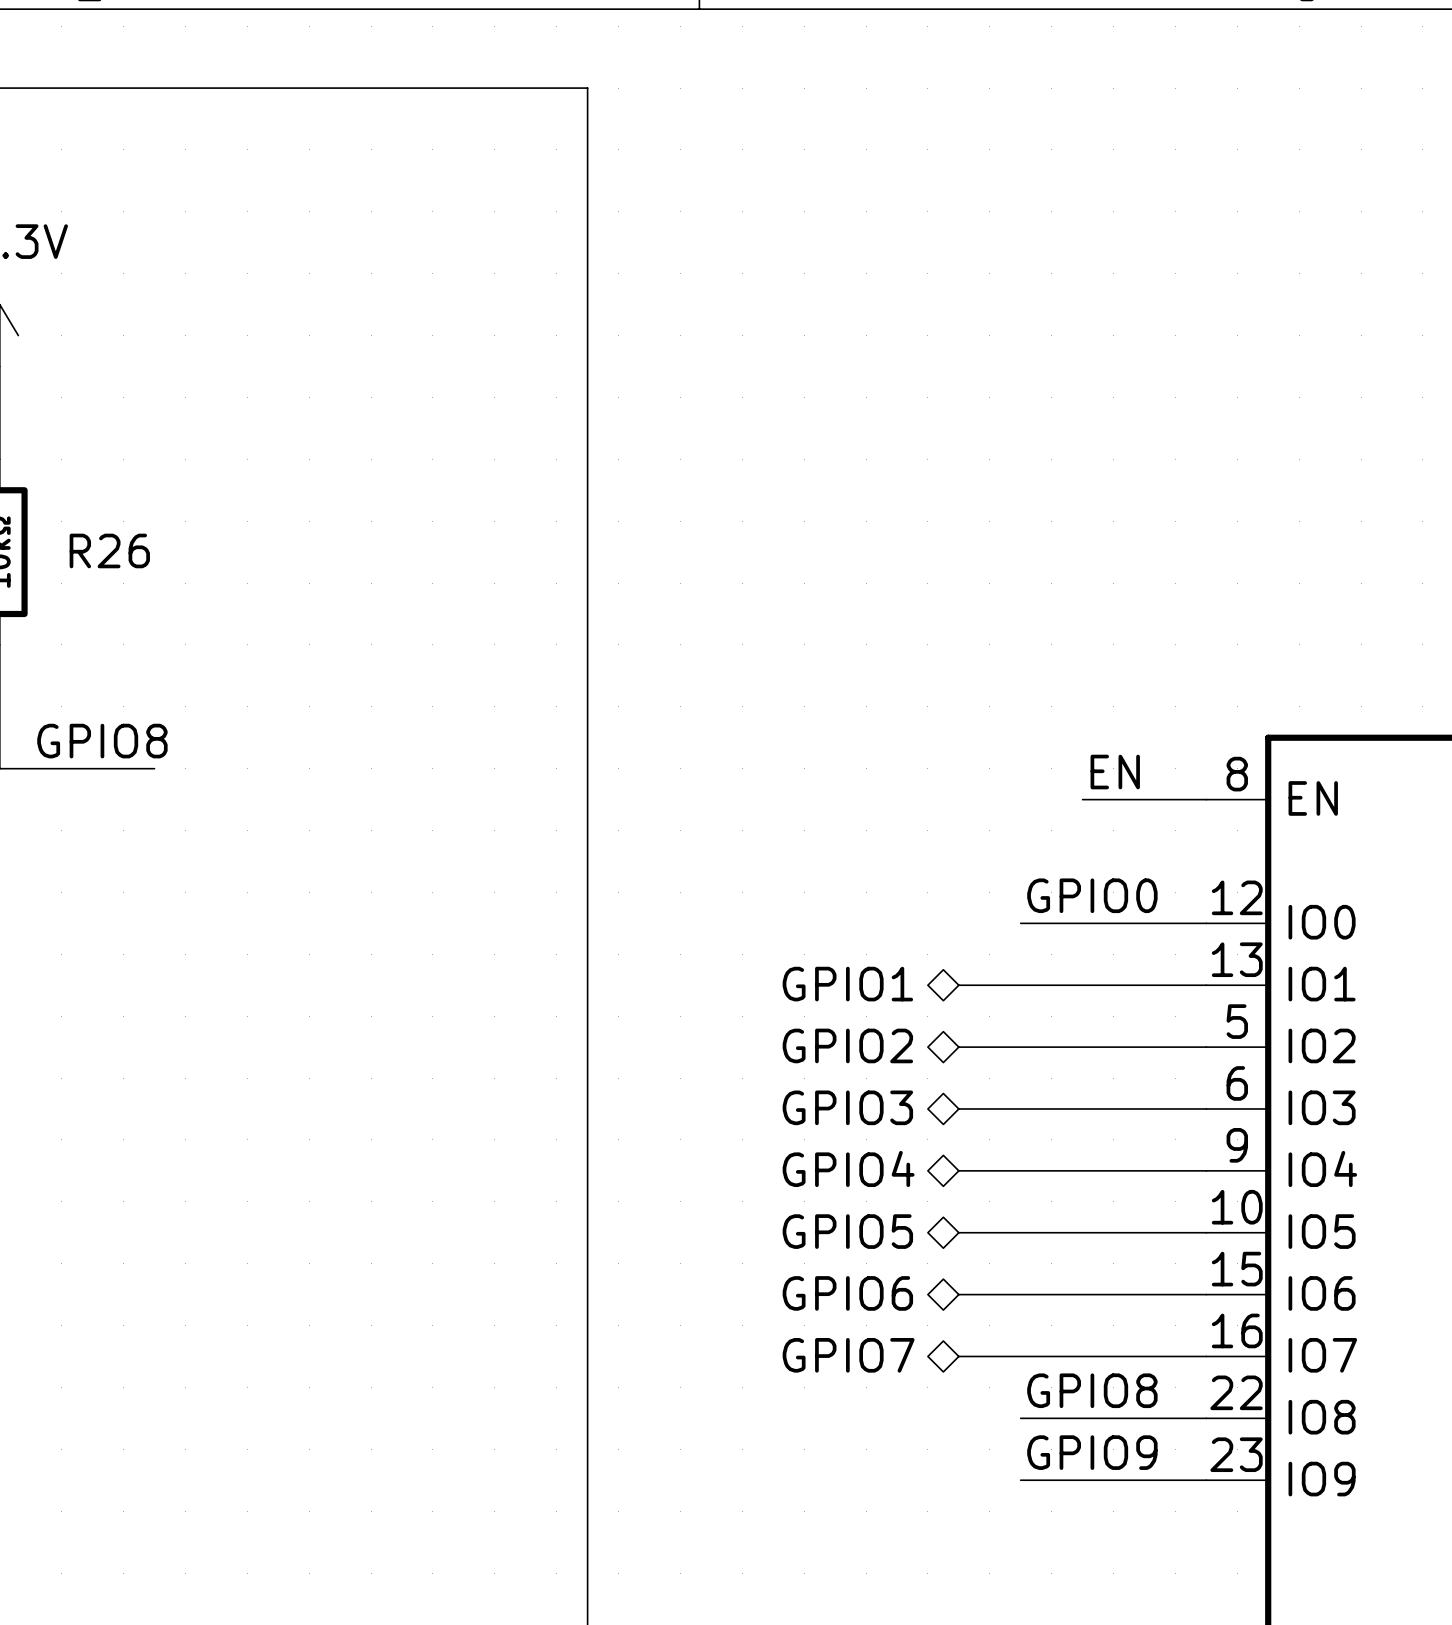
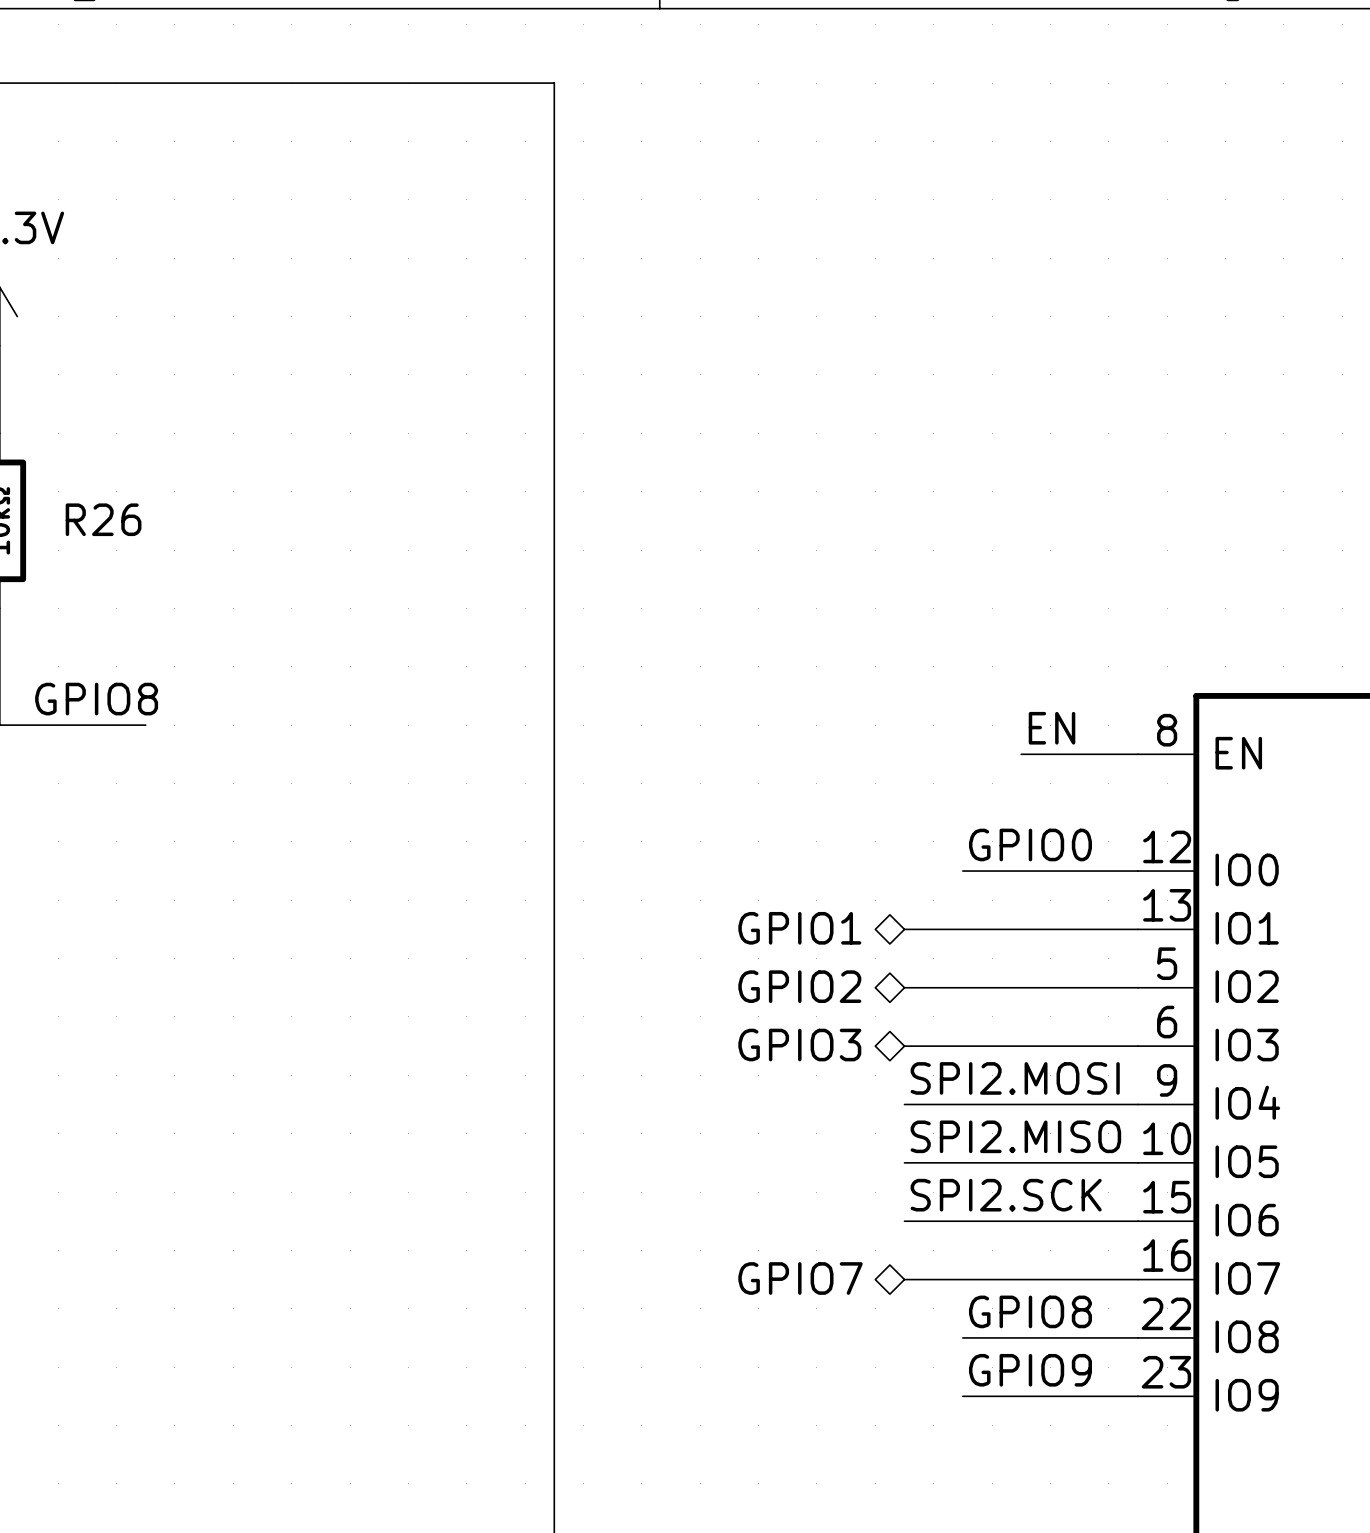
label: none -> SPI2.MOSI (1015, 1078)
hierarchical label: GPIO4 (848, 1168) -> none
label: none -> SPI2.MISO (1015, 1136)
hierarchical label: GPIO5 (847, 1231) -> none
label: none -> SPI2.SCK (1006, 1195)
hierarchical label: GPIO6 (847, 1293) -> none

